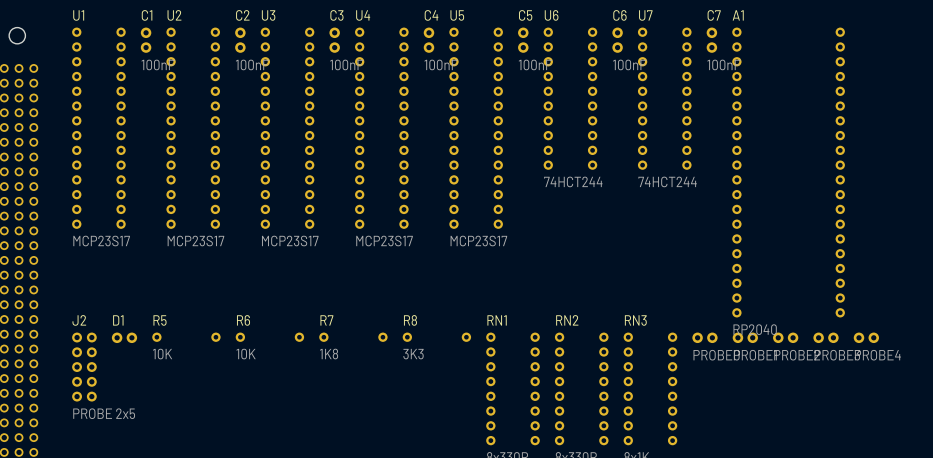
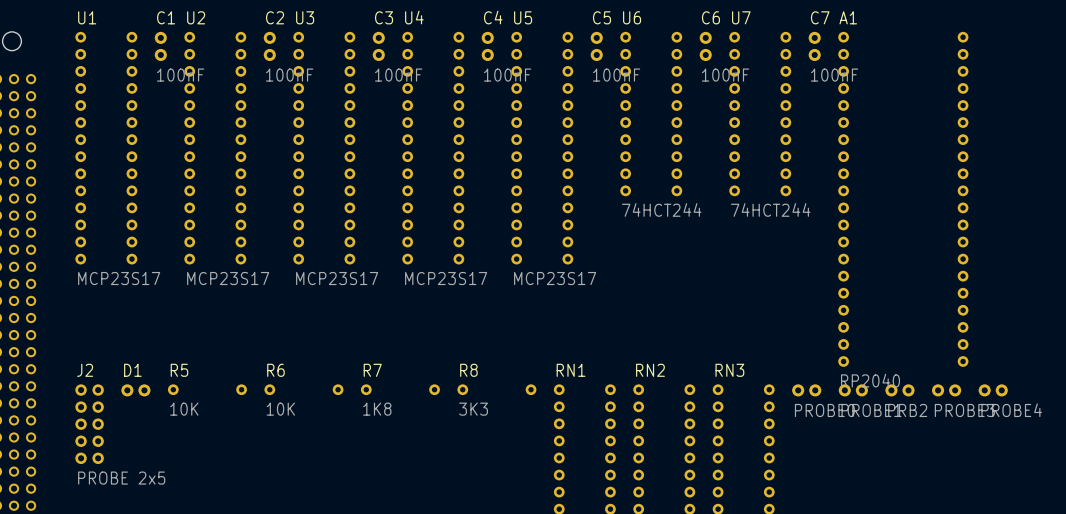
part value: PROBE2 (797, 355) -> PRB2 (907, 410)

